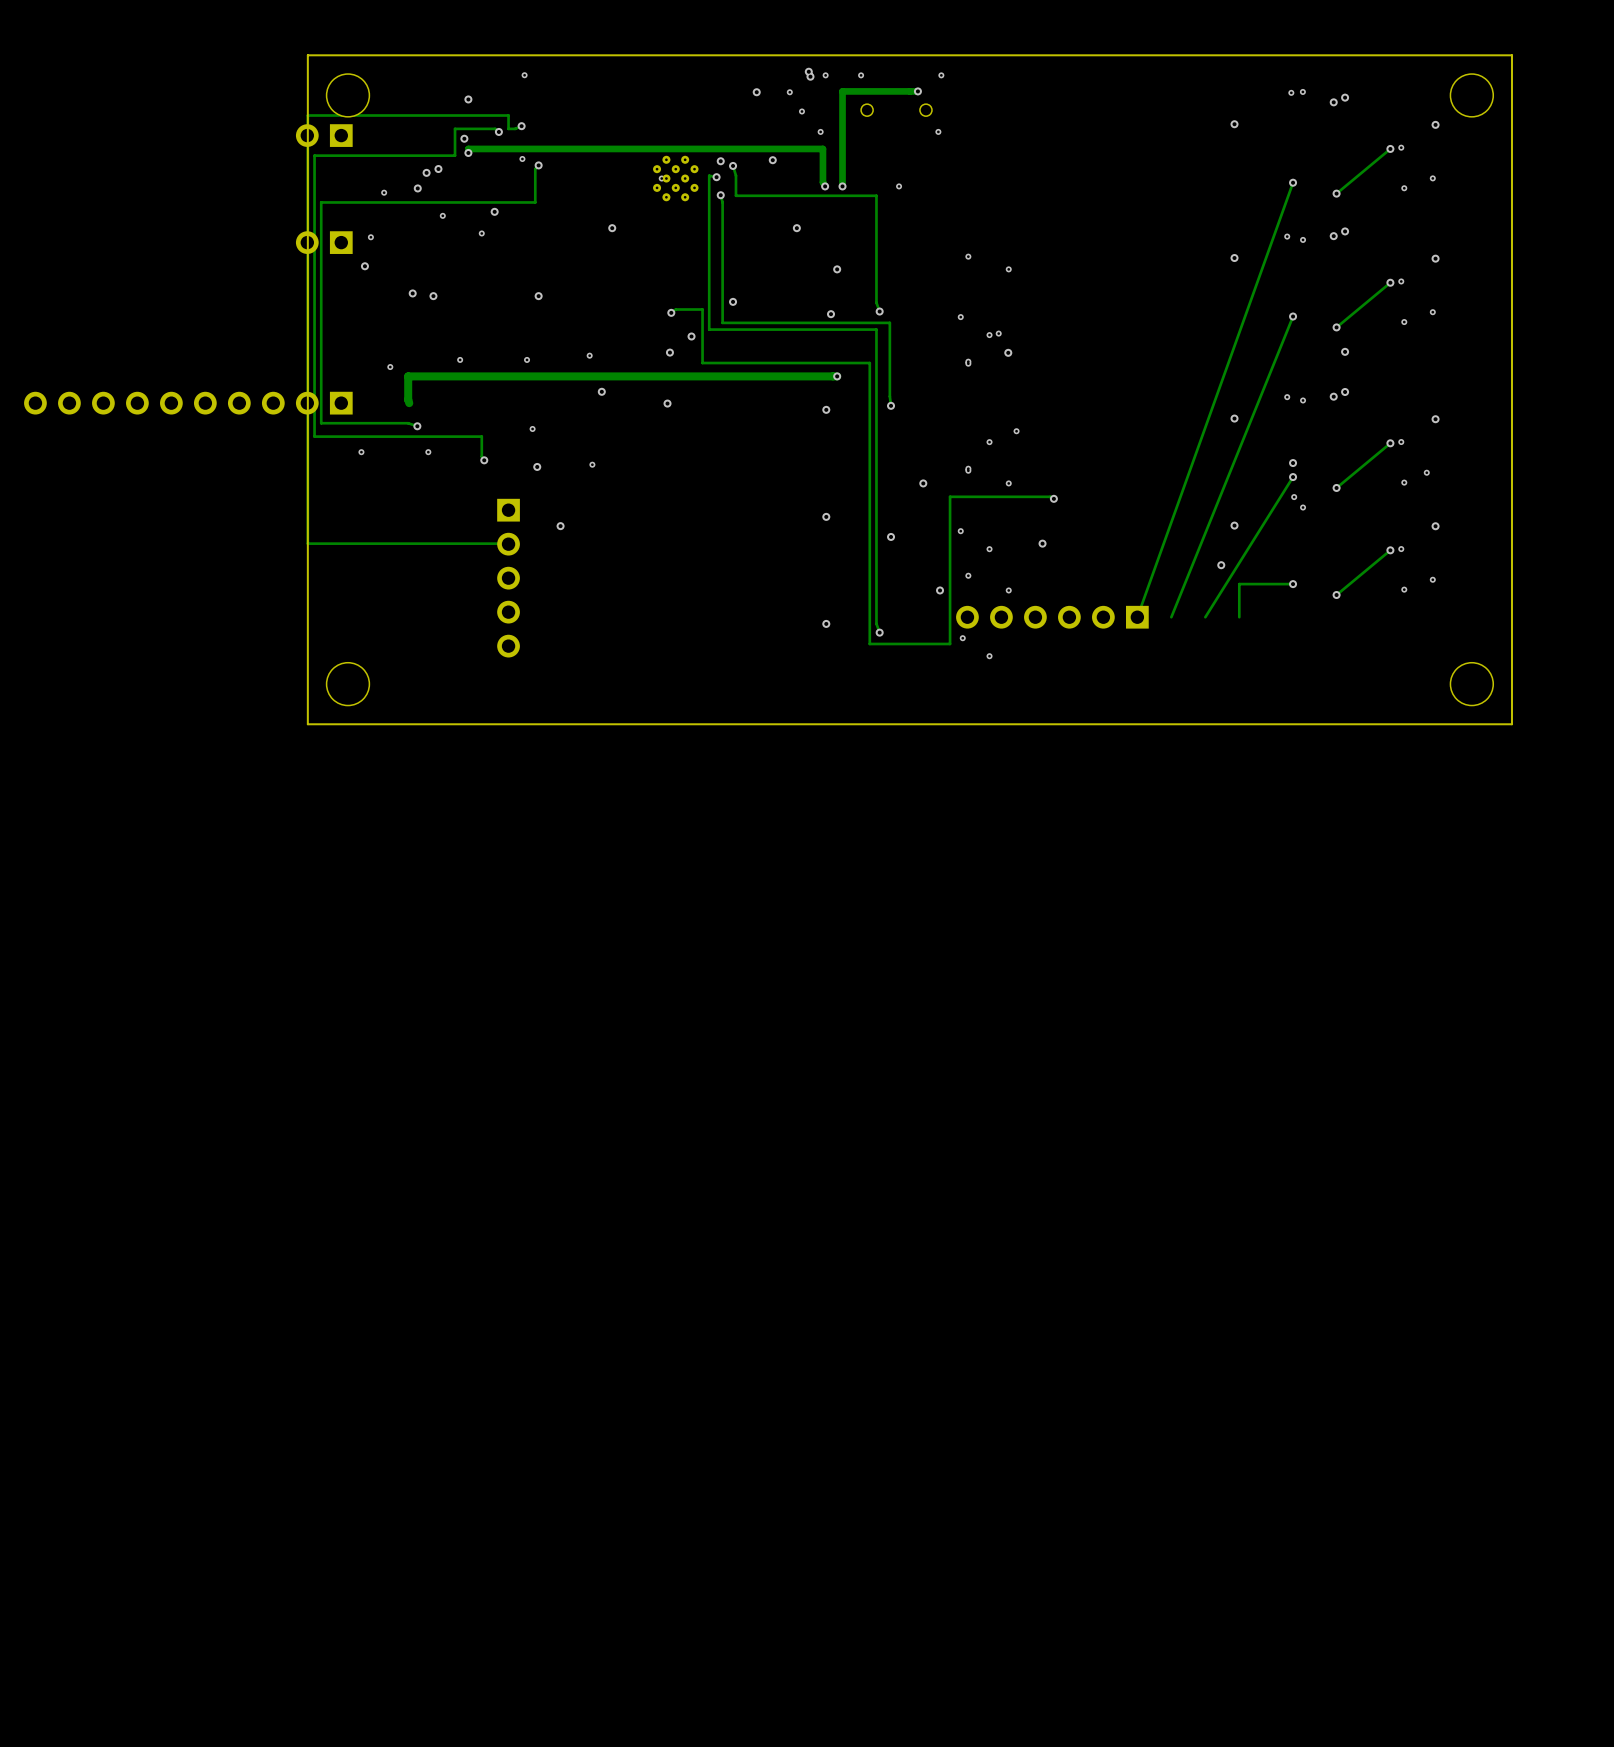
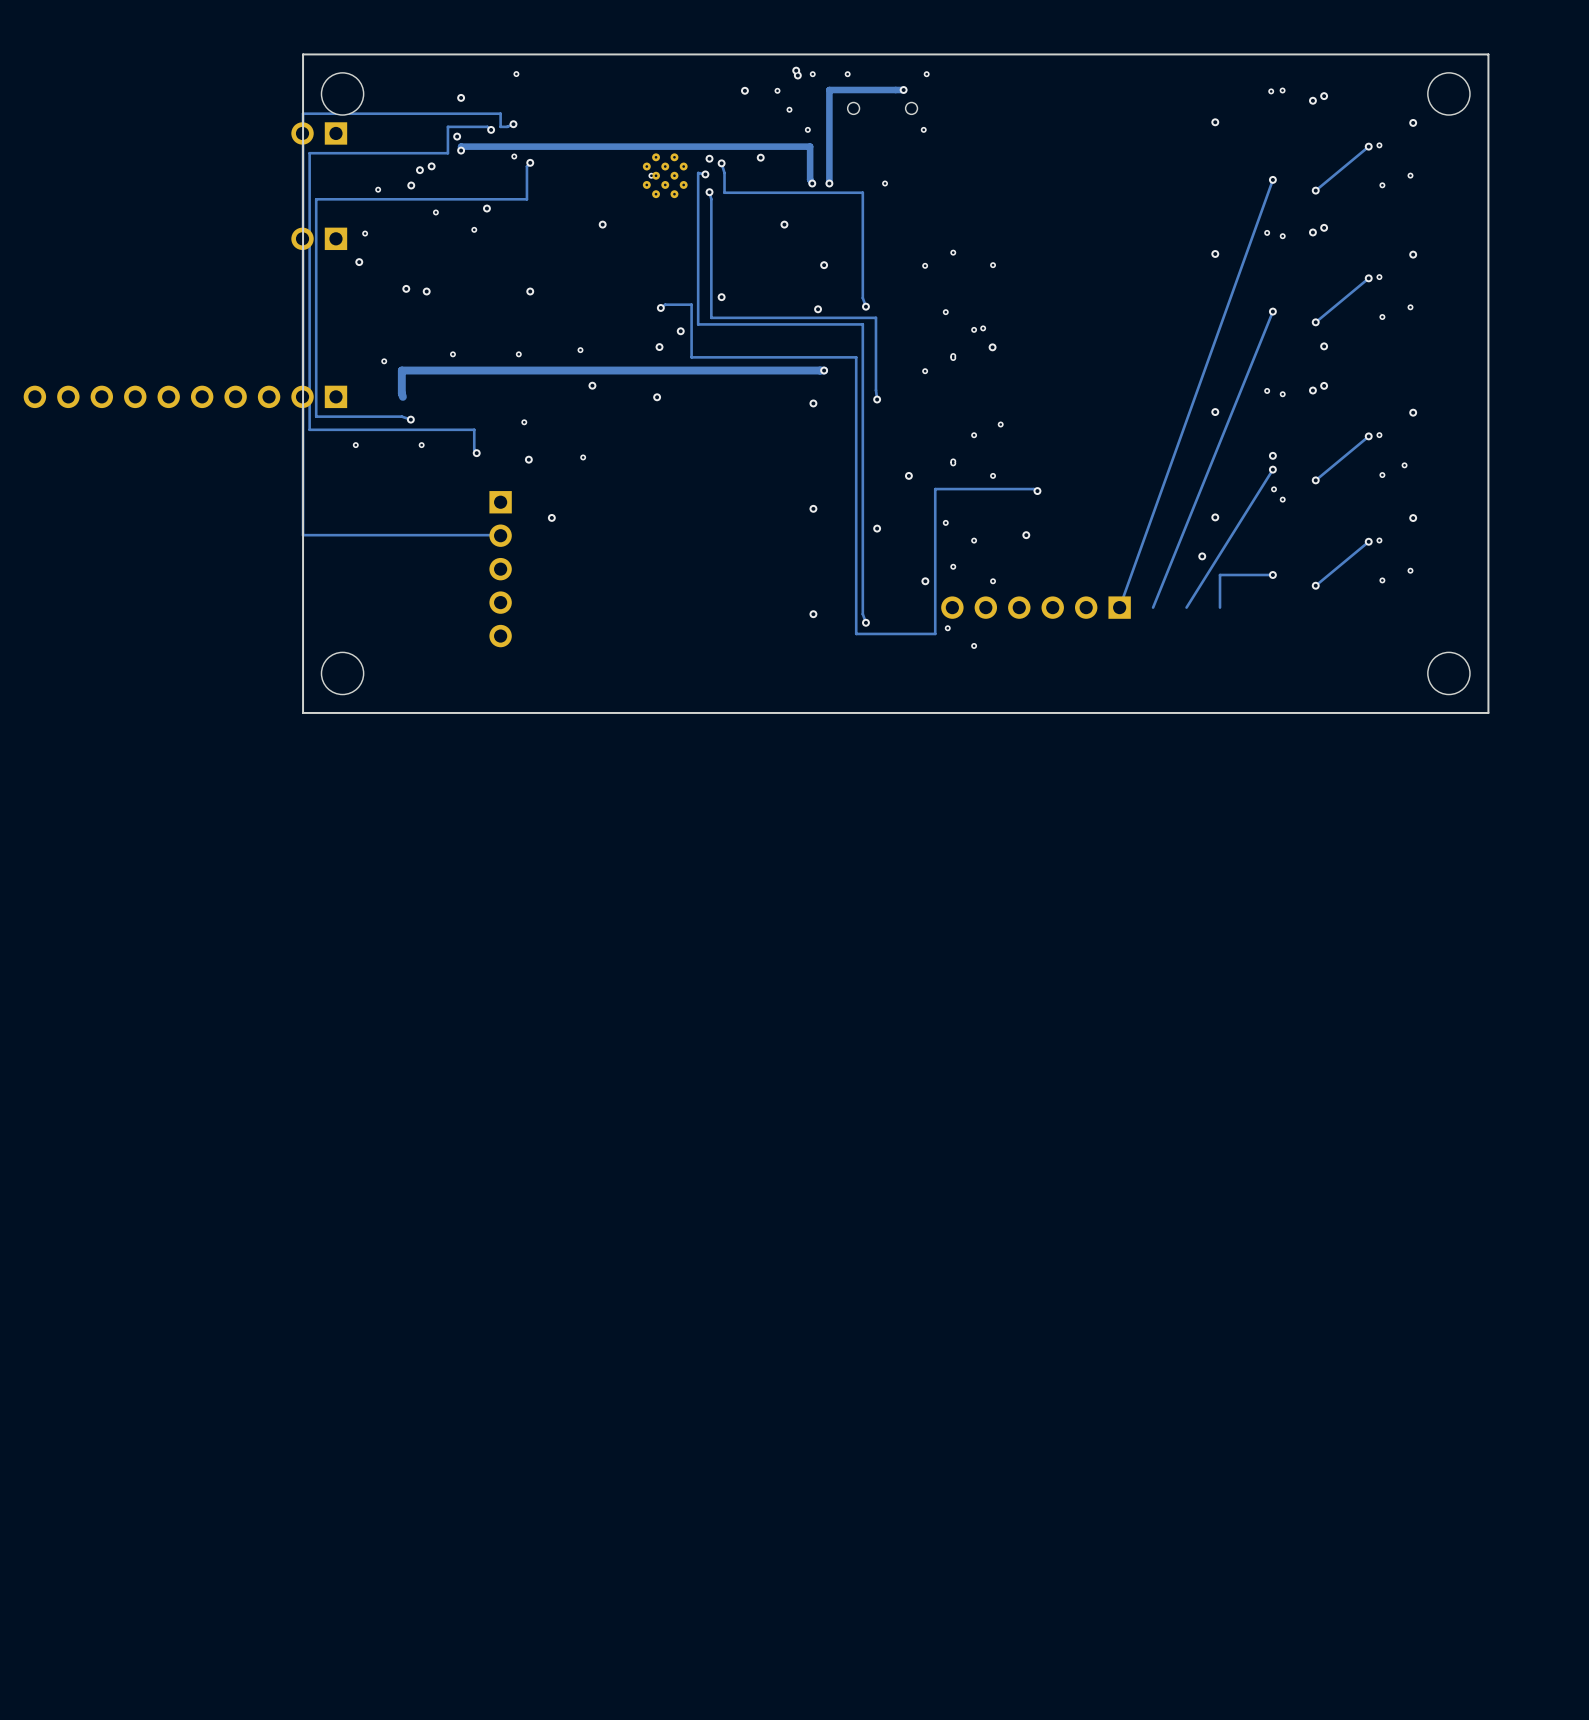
via: none -> (925, 265)
via: none -> (925, 371)

